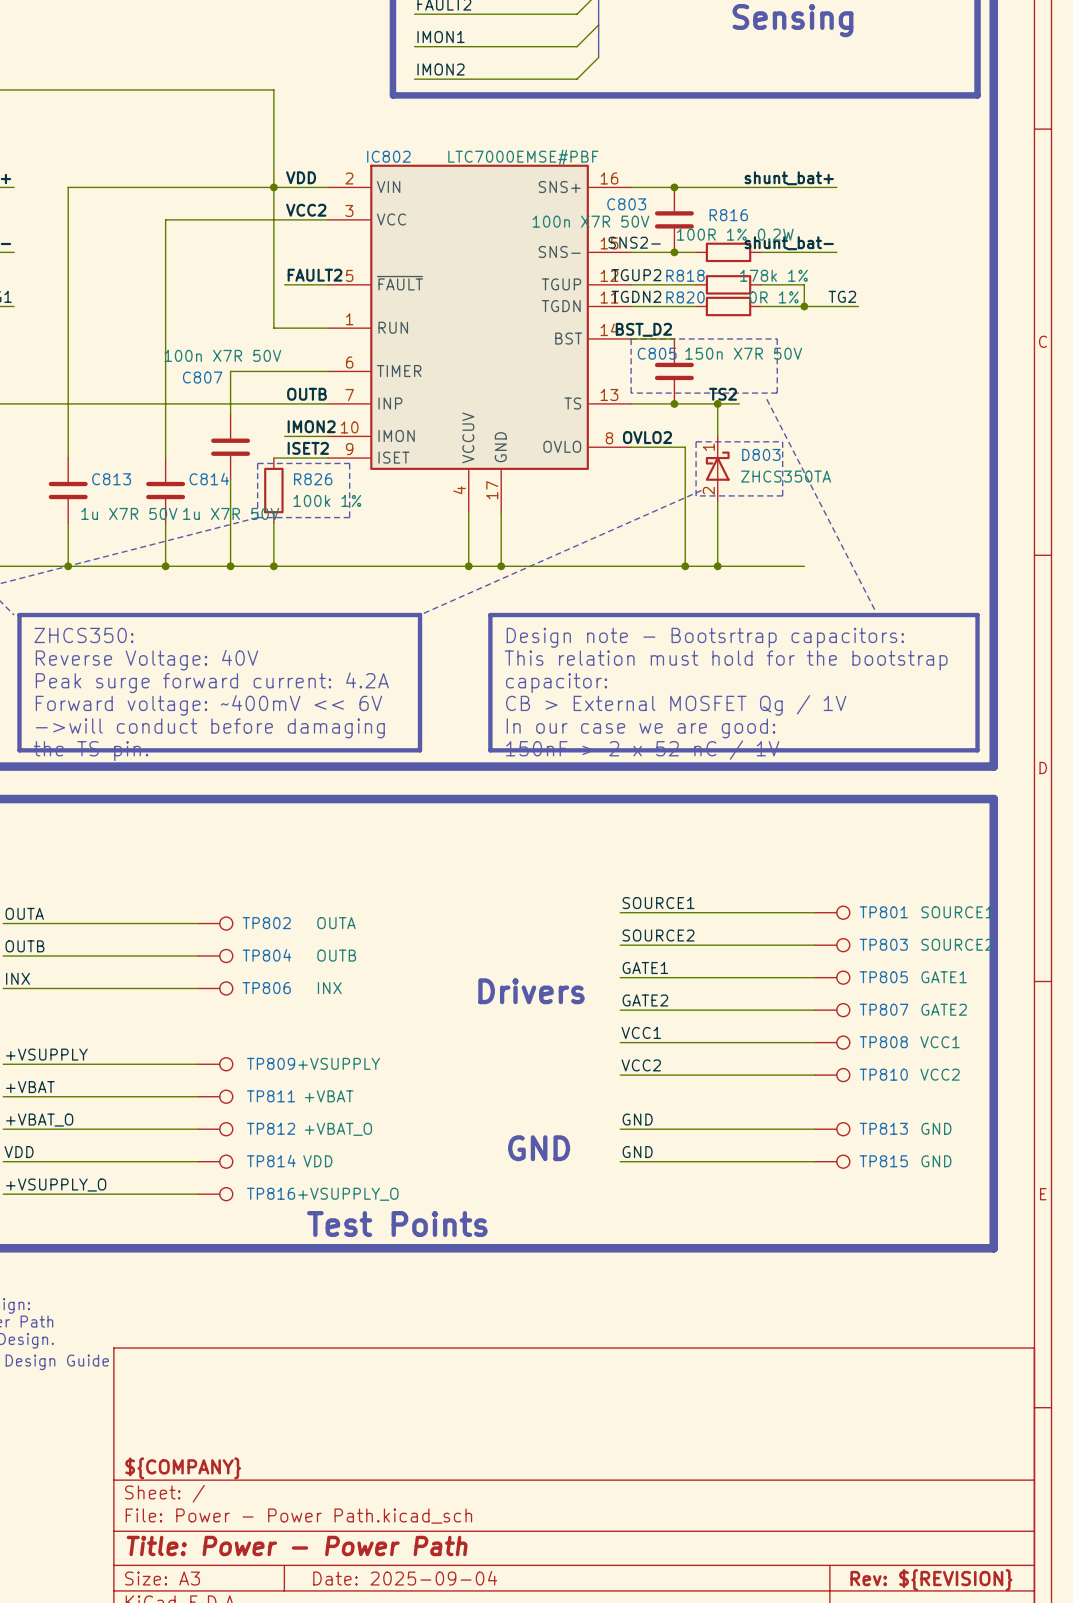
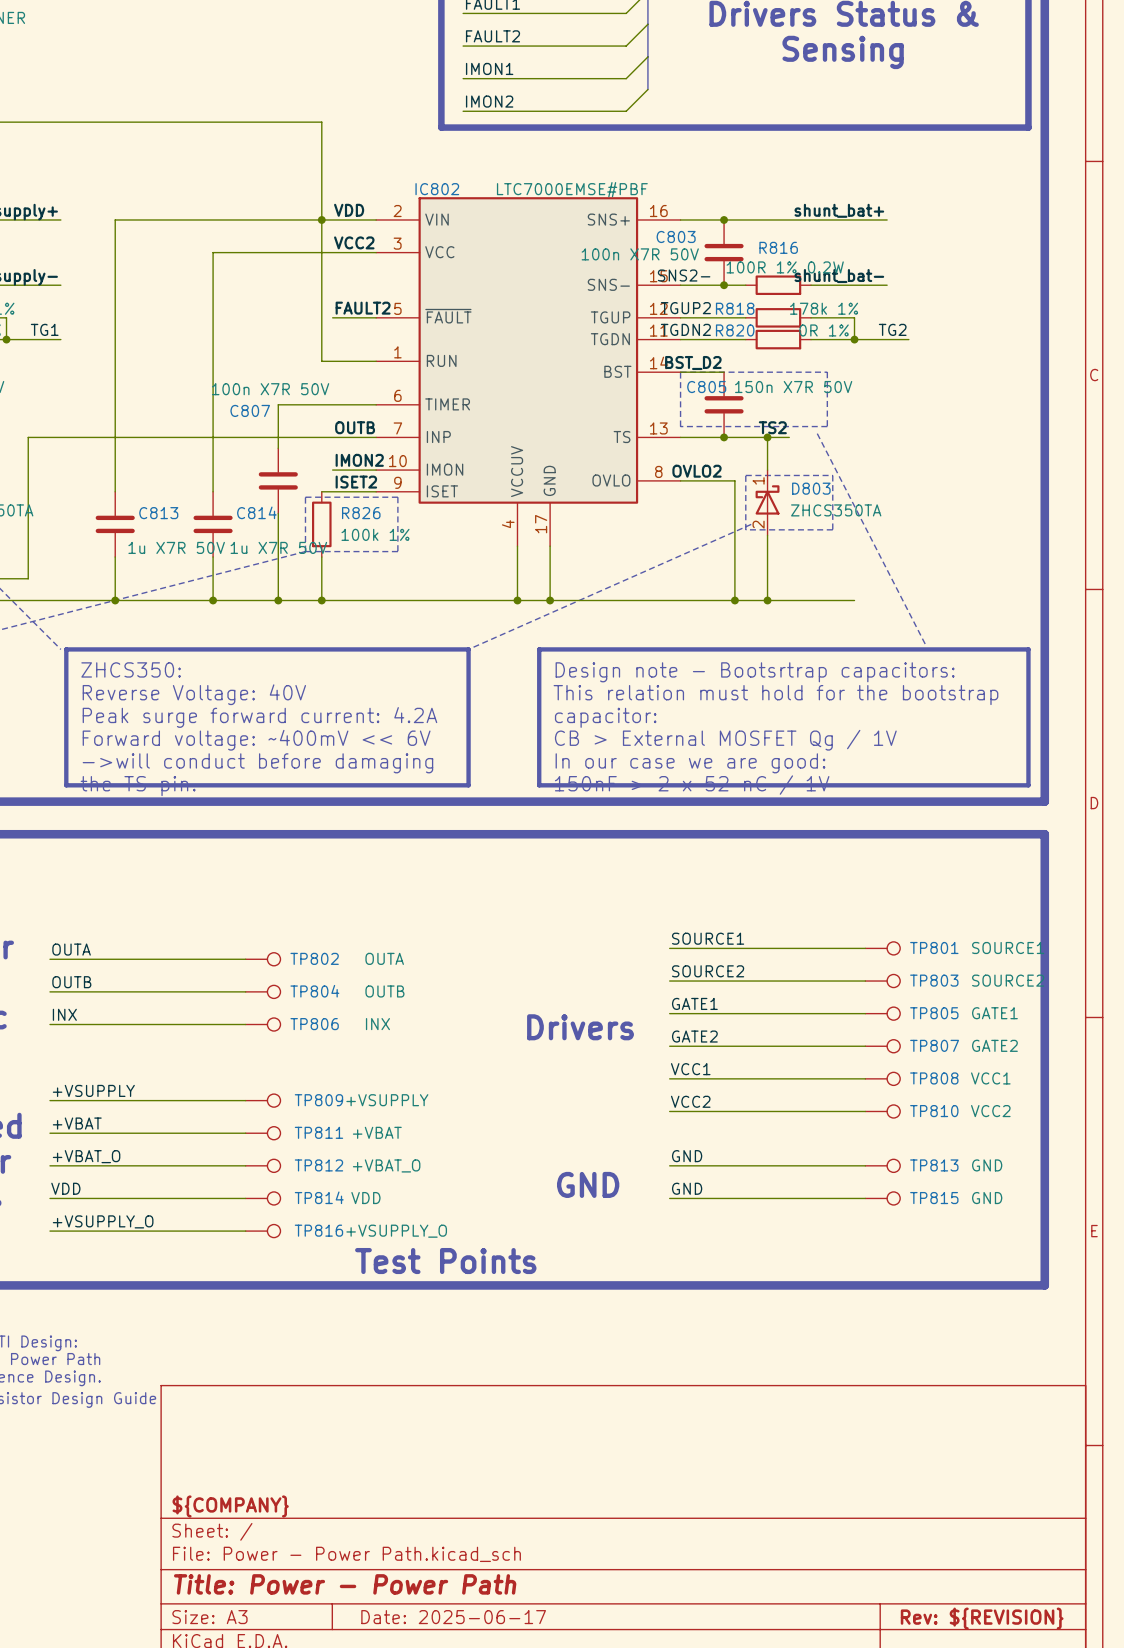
title block: Date: 2025-09-04 (405, 1578) -> Date: 2025-06-17 (453, 1617)

